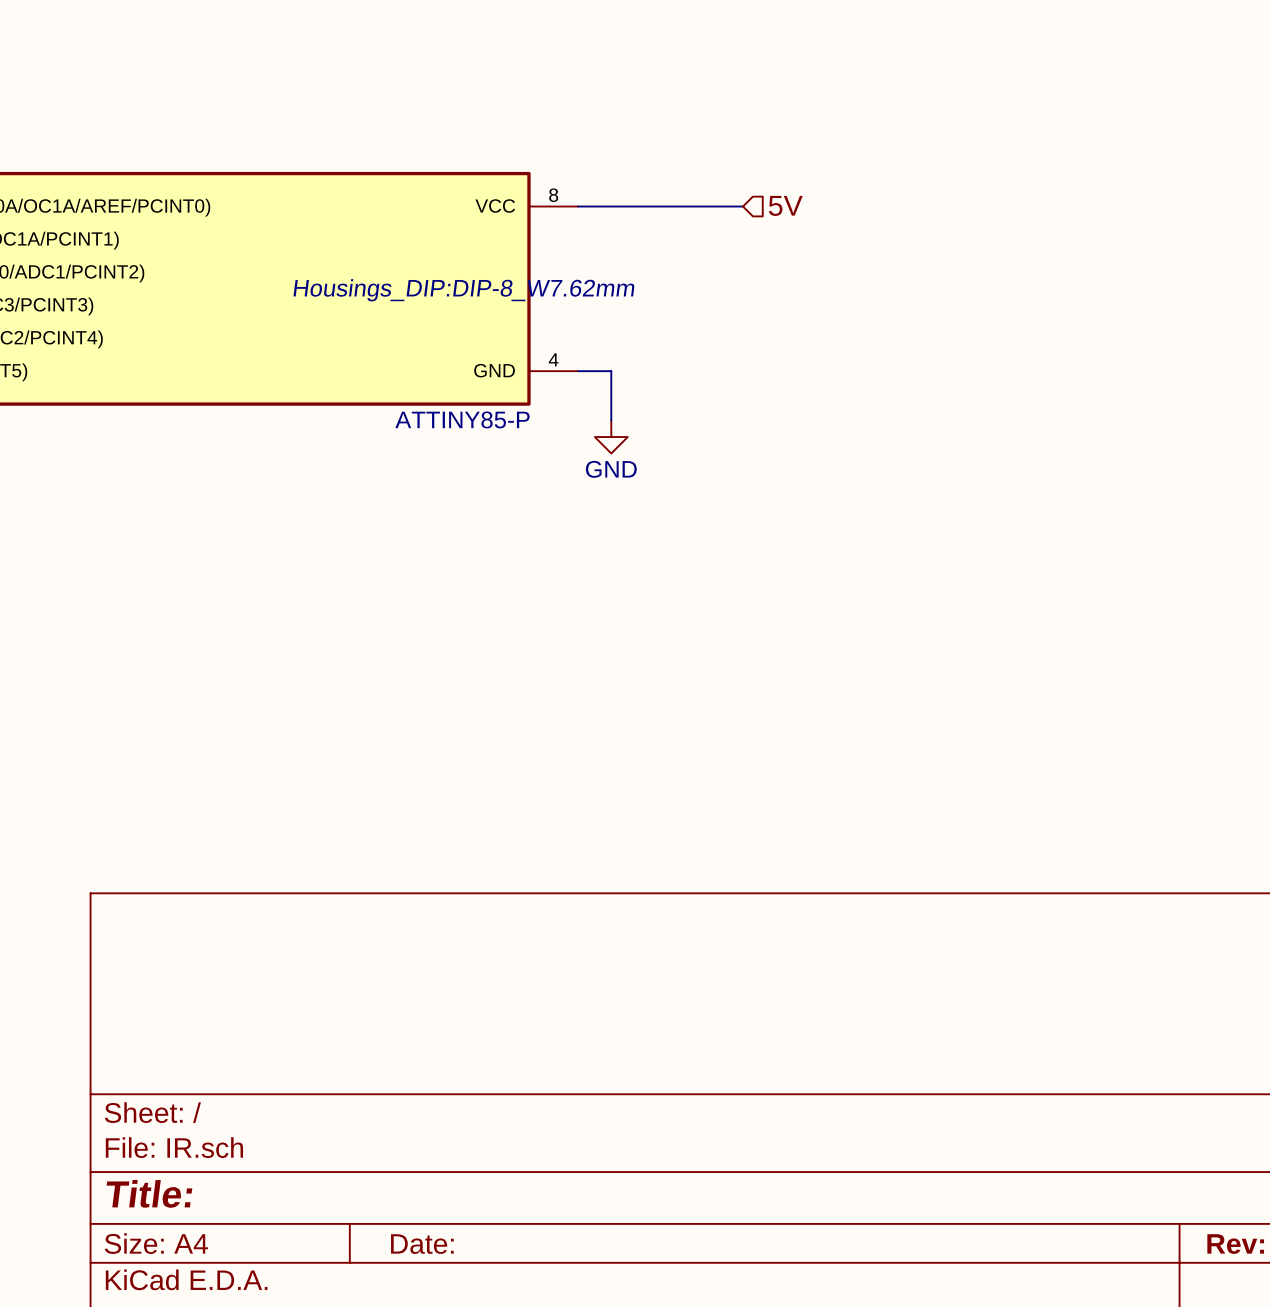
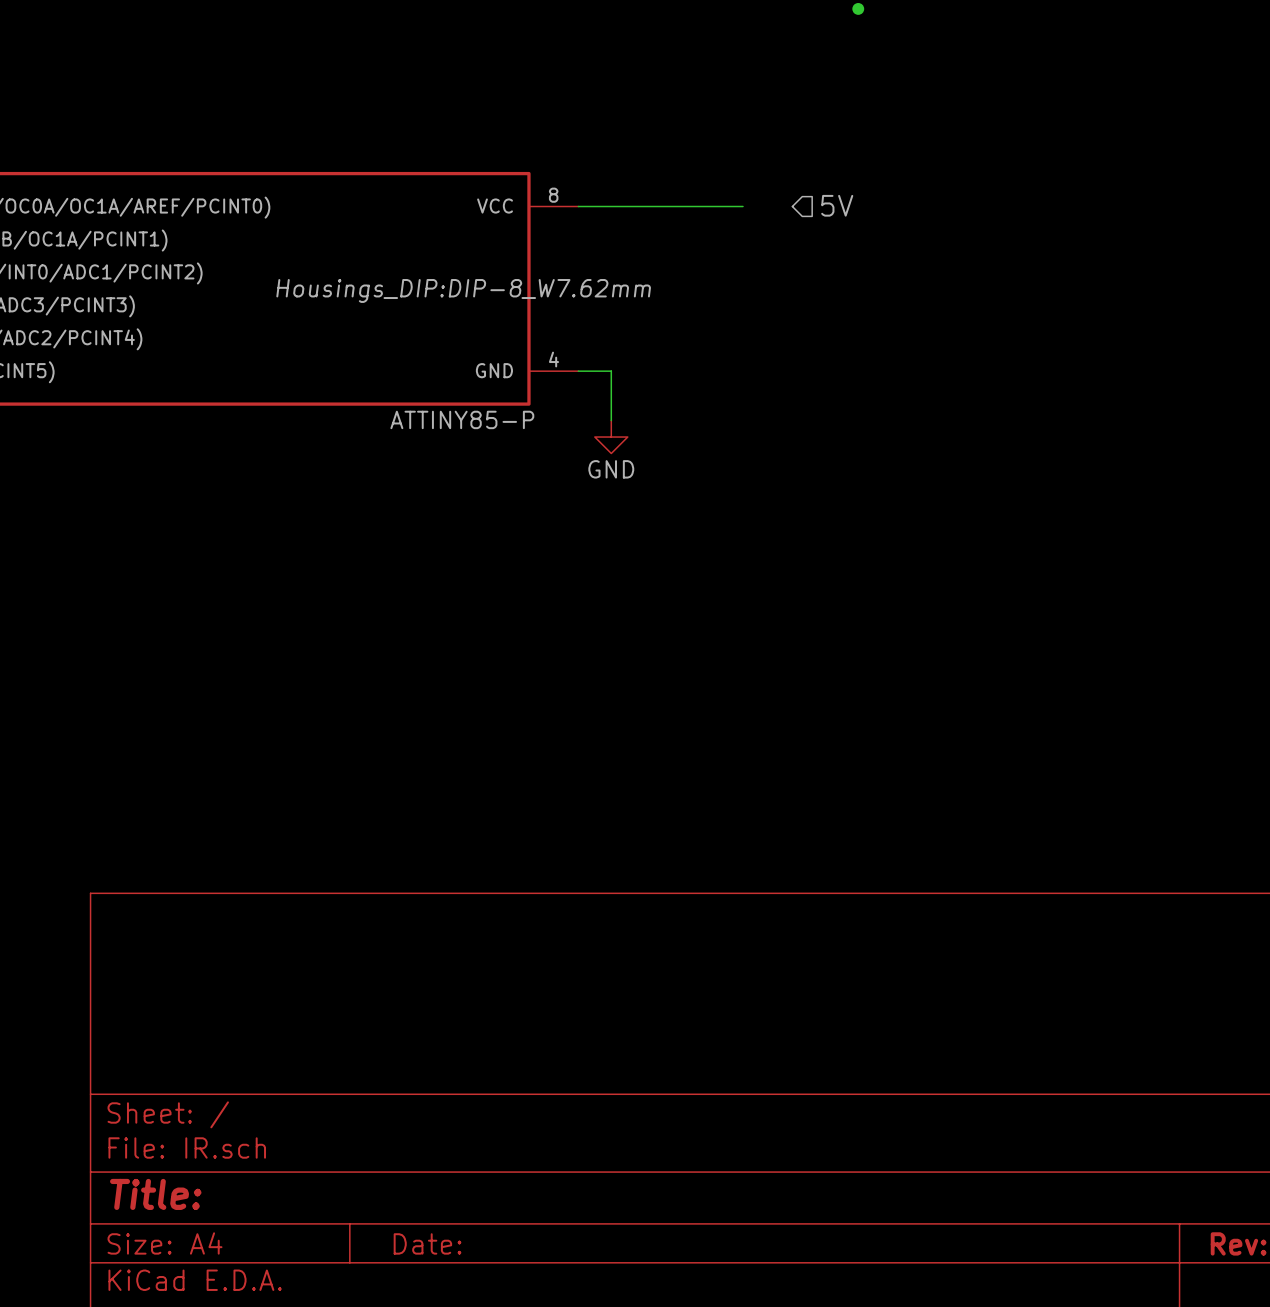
junction: none -> (858, 8)
hierarchical label position: 5V (785, 205) -> 5V (837, 205)

